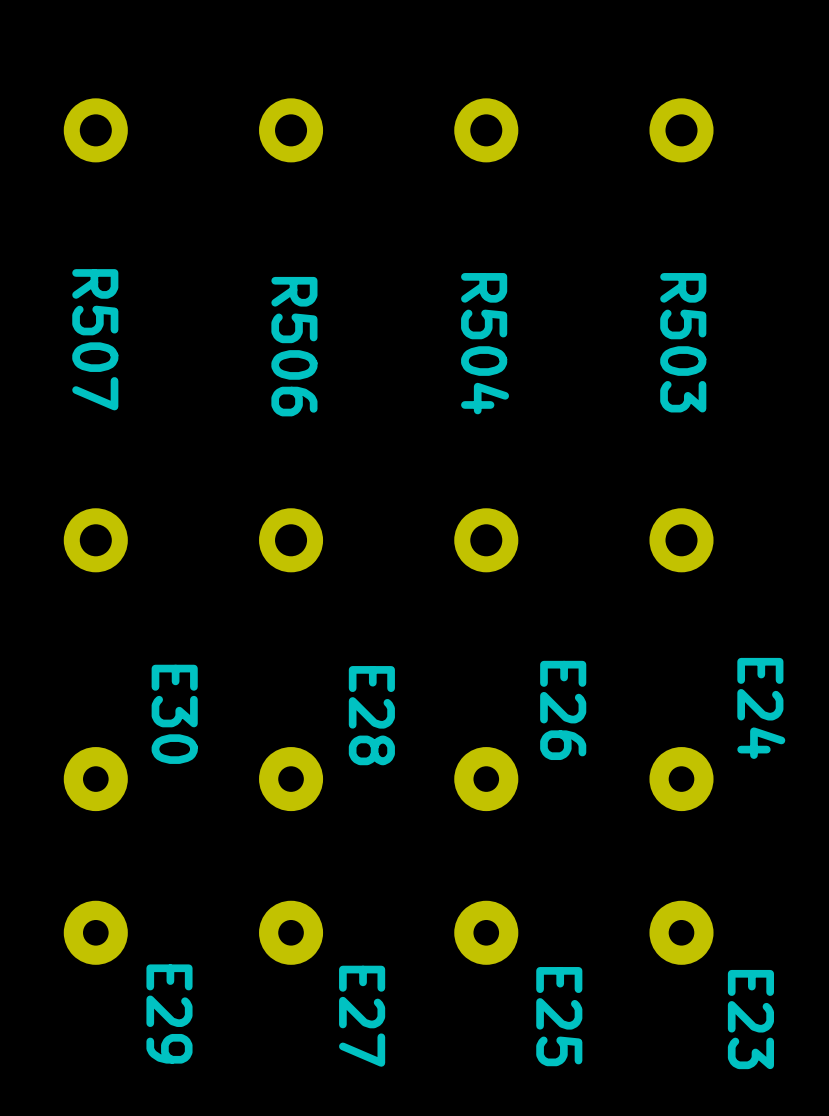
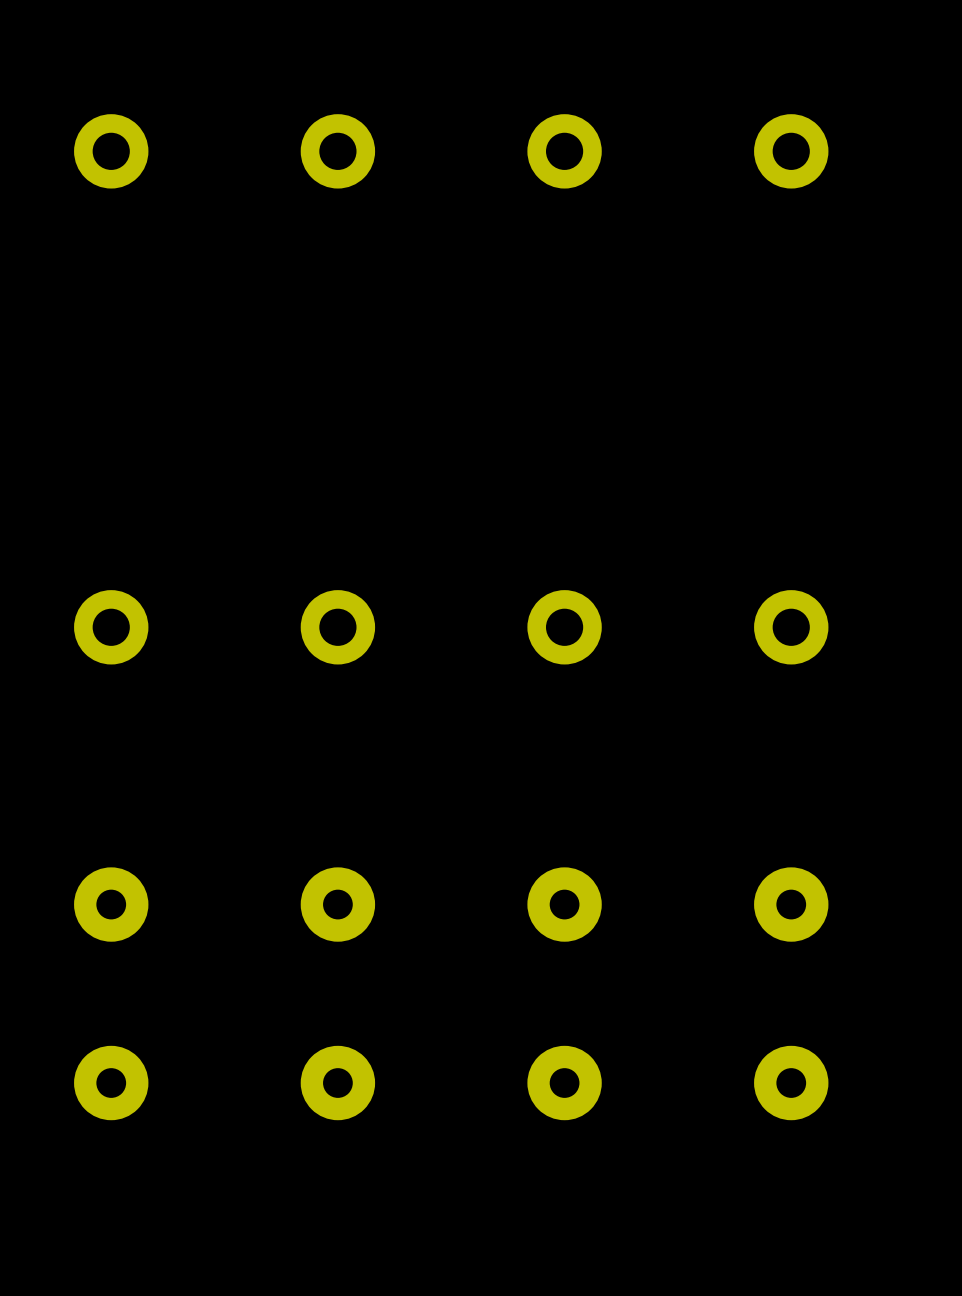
text: R507 (95, 339) -> none
text: R503 (683, 342) -> none
text: R504 (485, 343) -> none
text: R506 (294, 346) -> none
text: E24 (761, 708) -> none
text: E26 (563, 710) -> none
text: E30 (174, 714) -> none
text: E28 (371, 715) -> none
text: E29 (169, 1014) -> none
text: E27 (362, 1016) -> none
text: E25 (559, 1016) -> none
text: E23 (750, 1019) -> none

